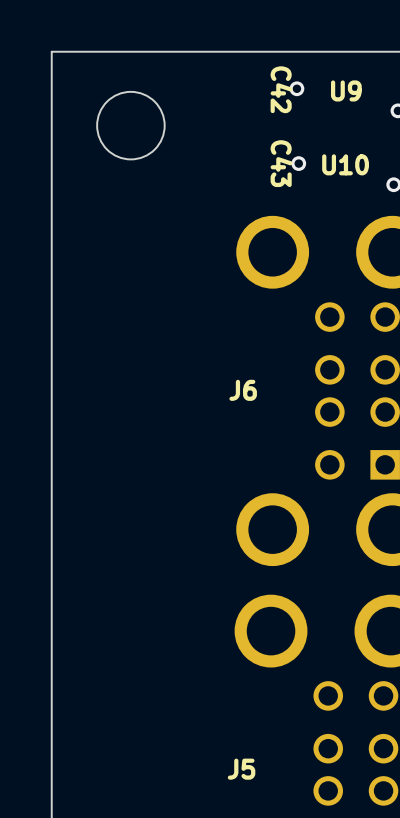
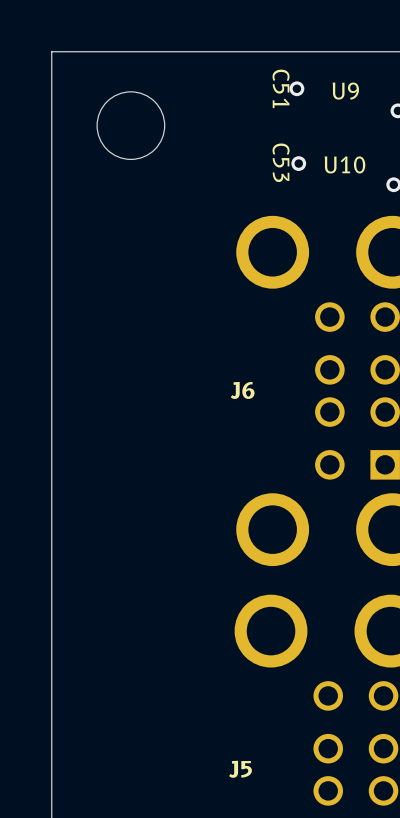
C42 name: C42 (281, 89) -> C51 (281, 88)
C43 name: C43 (281, 163) -> C53 (281, 162)

